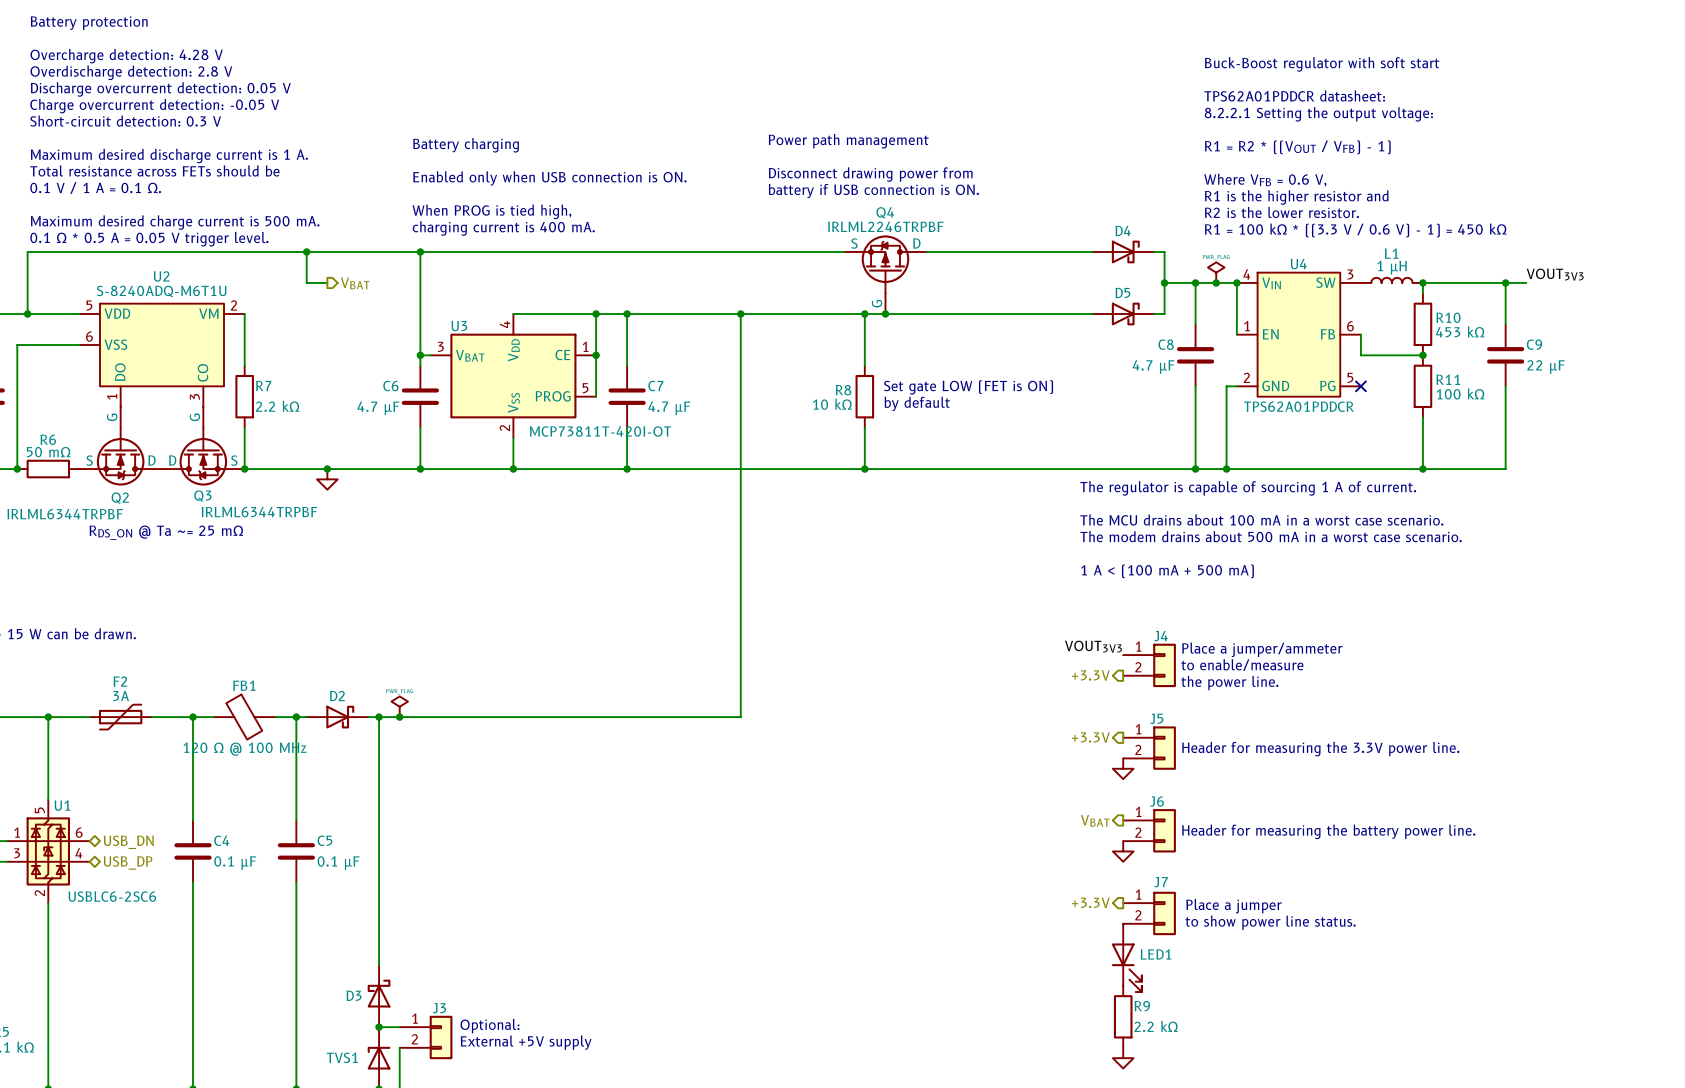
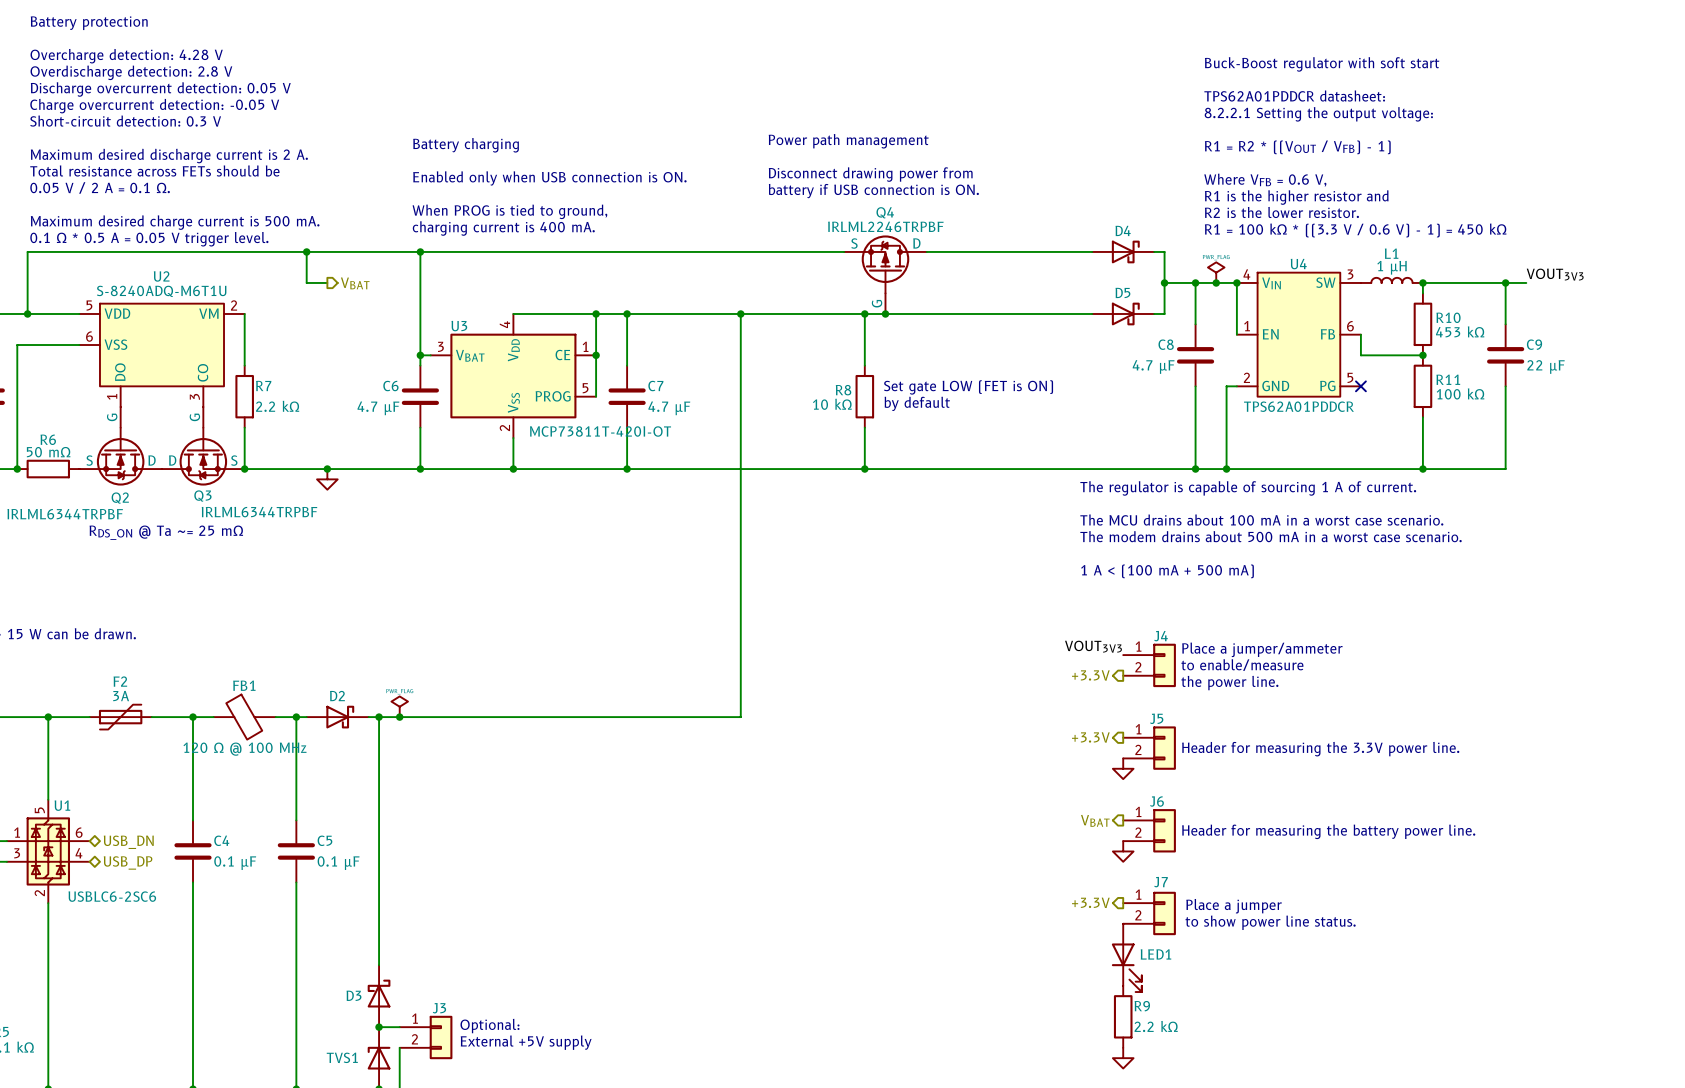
text: Maximum desired discharge current is 1 A. (169, 156) -> Maximum desired discharge current is 2 A. (169, 156)
text: 0.1 V / 1 A = 0.1 Ω. (95, 187) -> 0.05 V / 2 A = 0.1 Ω. (100, 187)
text: When PROG is tied high, (491, 211) -> When PROG is tied to ground, (509, 211)

